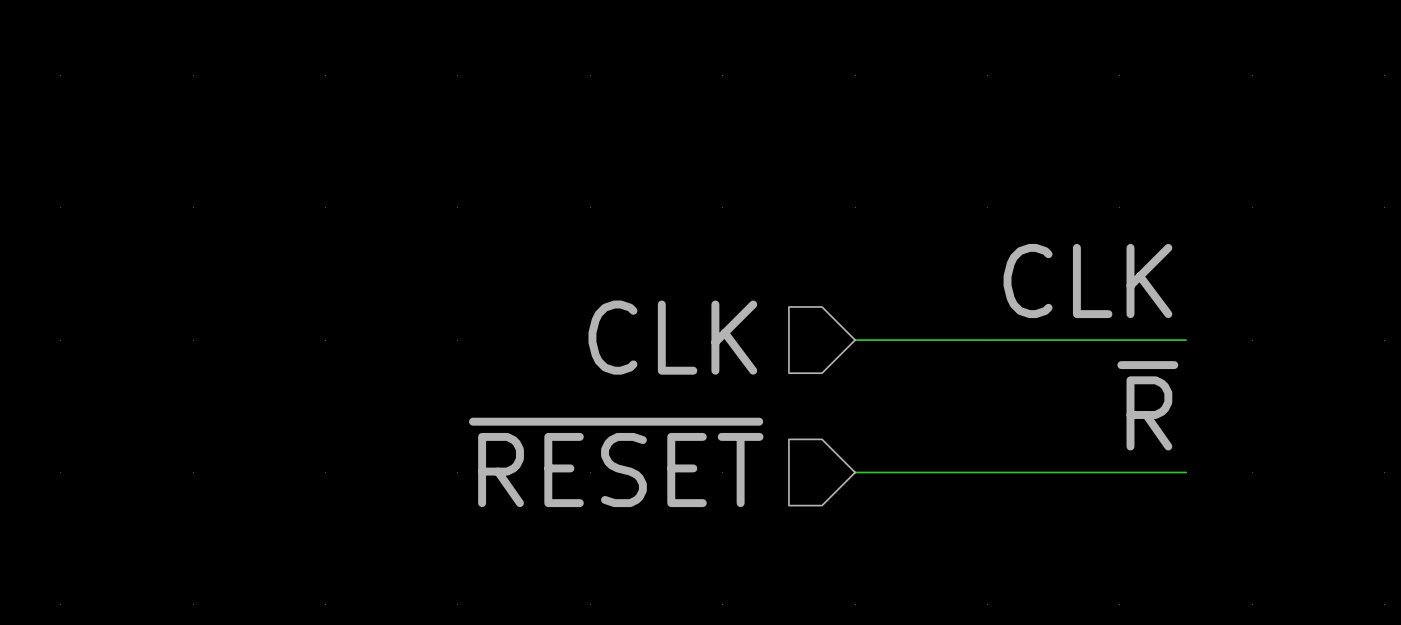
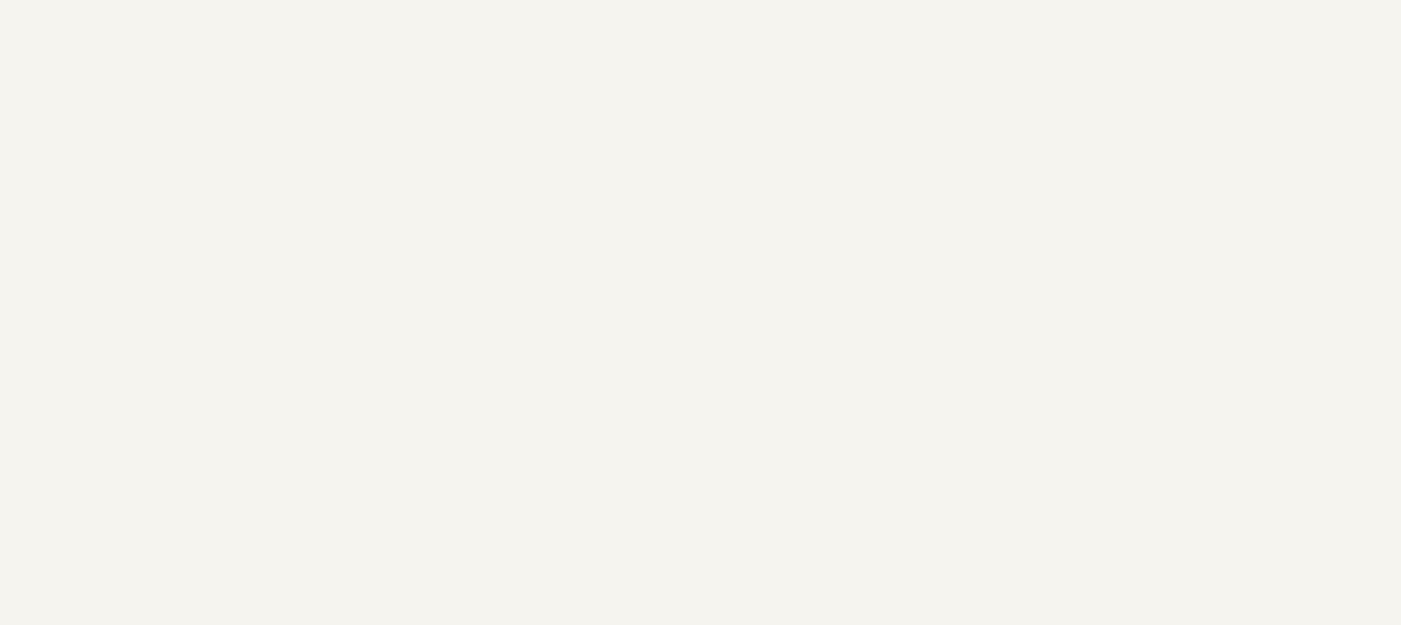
label: CLK (1087, 281) -> none
hierarchical label: CLK (672, 337) -> none
wire: (855, 340) (1186, 340) -> none
label: ~{R} (1147, 405) -> none
hierarchical label: ~{RESET} (616, 462) -> none
wire: (855, 472) (1186, 472) -> none

